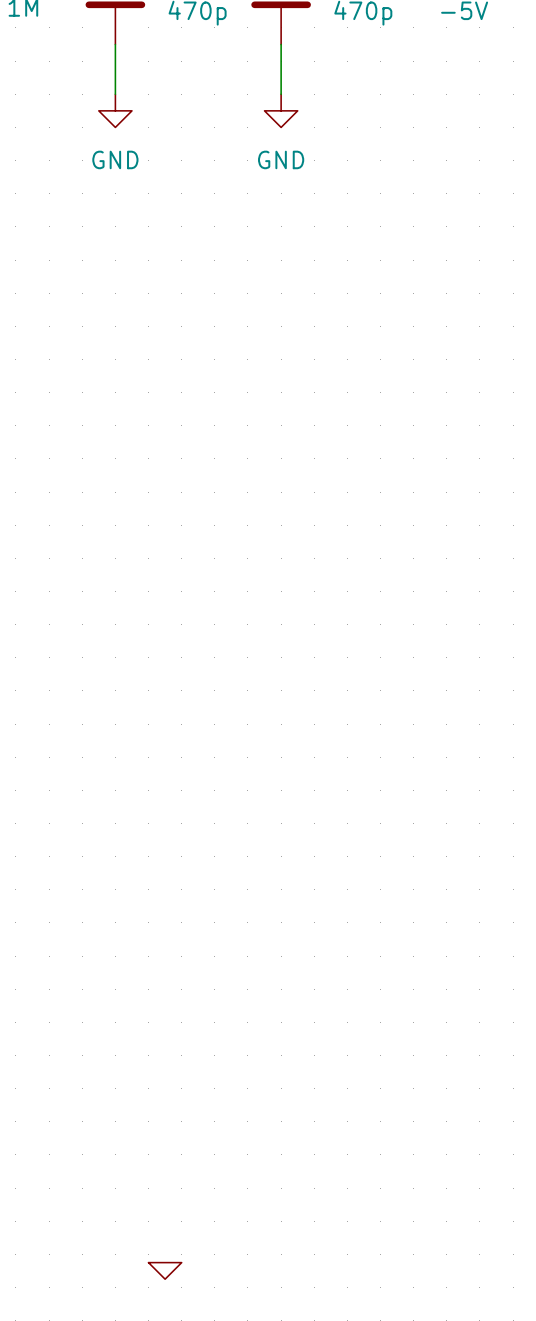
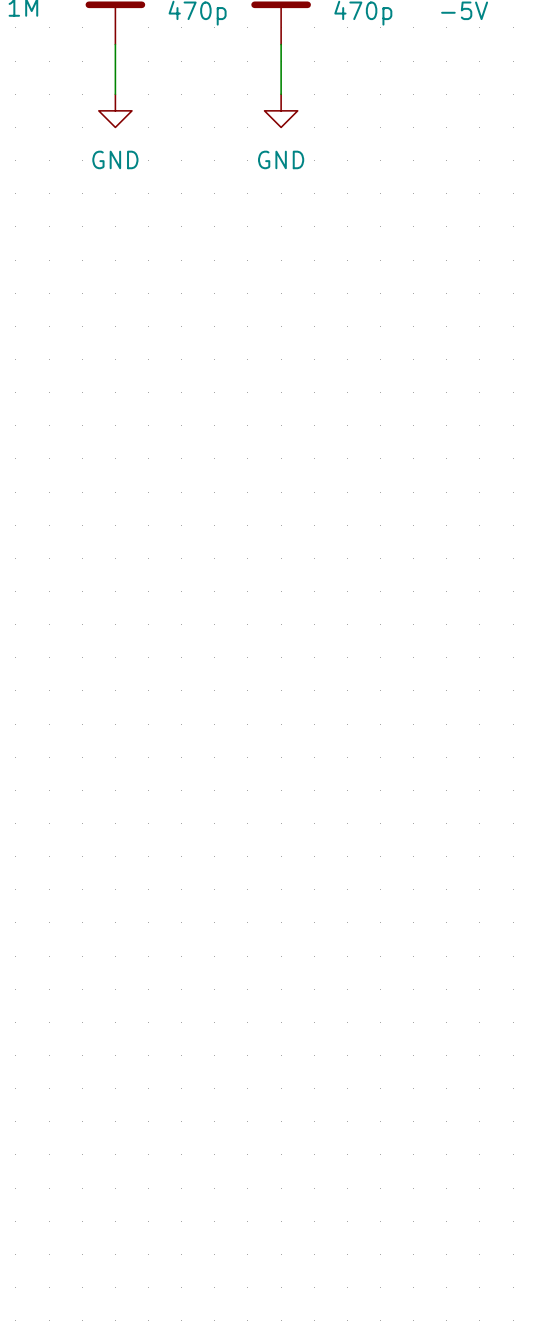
power symbol: (165, 1270) -> none

